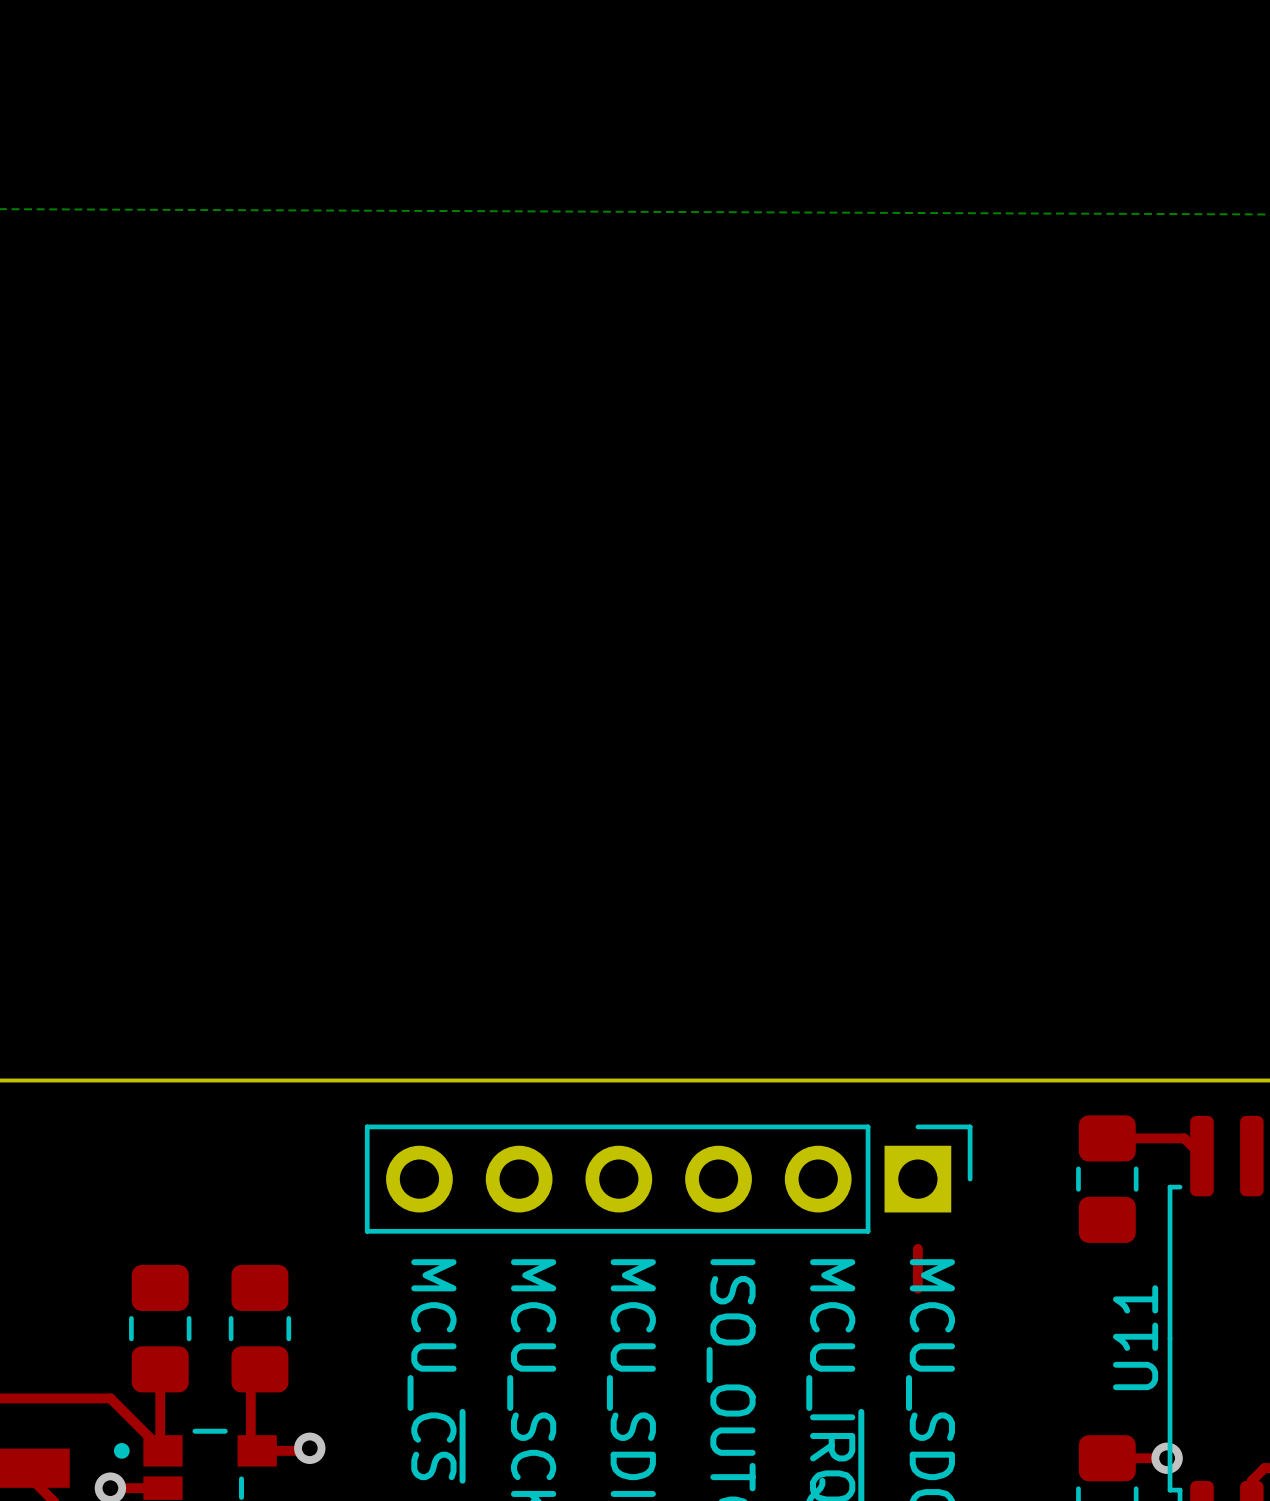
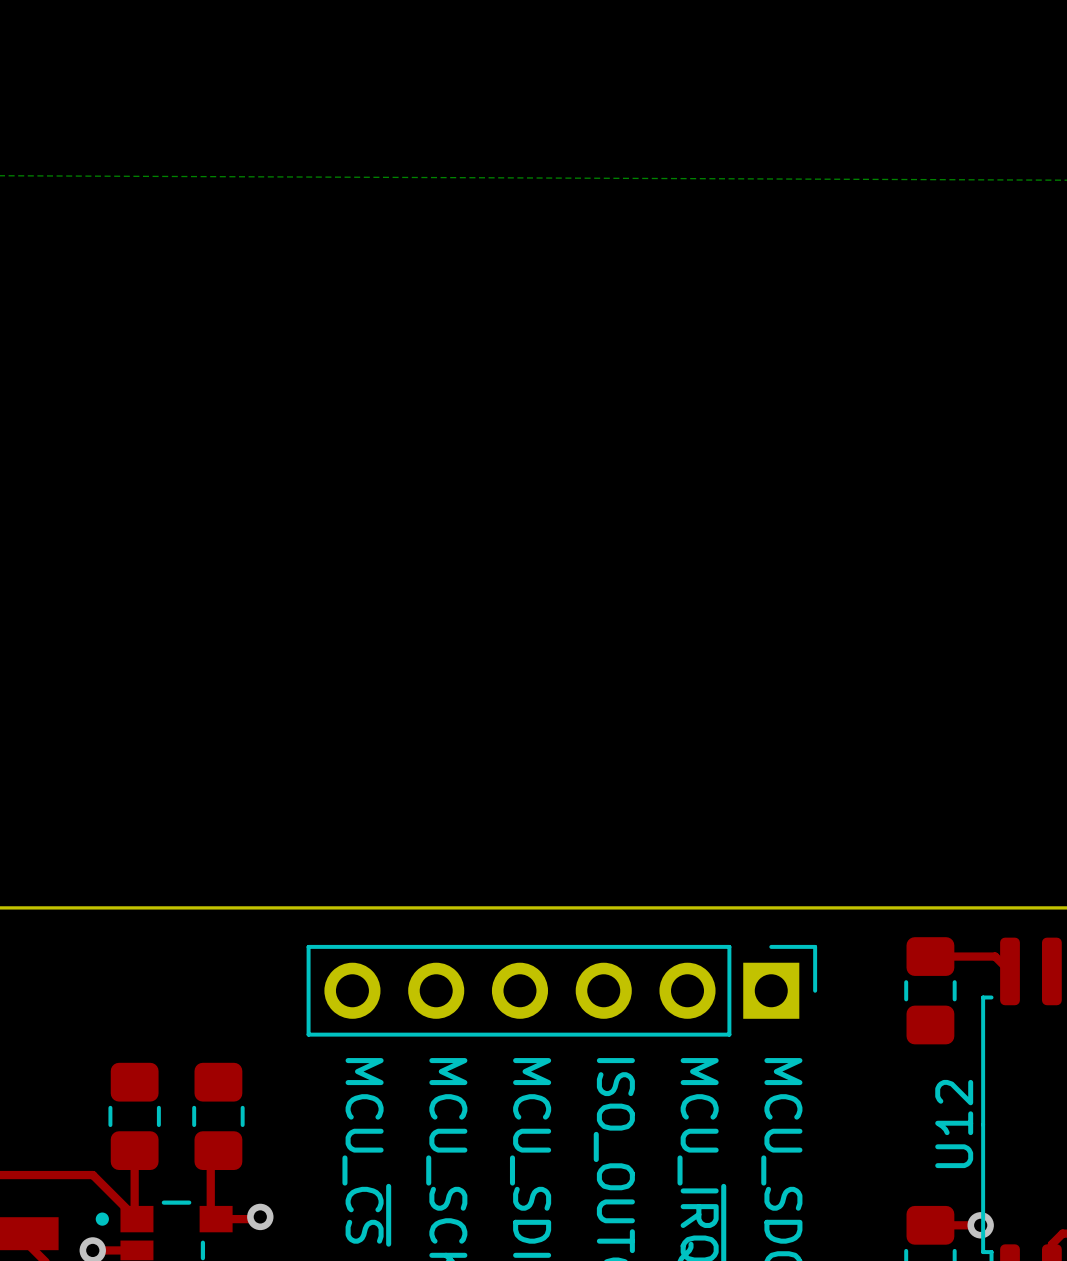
top track: (917, 1248) (917, 1288) -> none
U11 name: U11 (1135, 1337) -> U12 (954, 1124)

